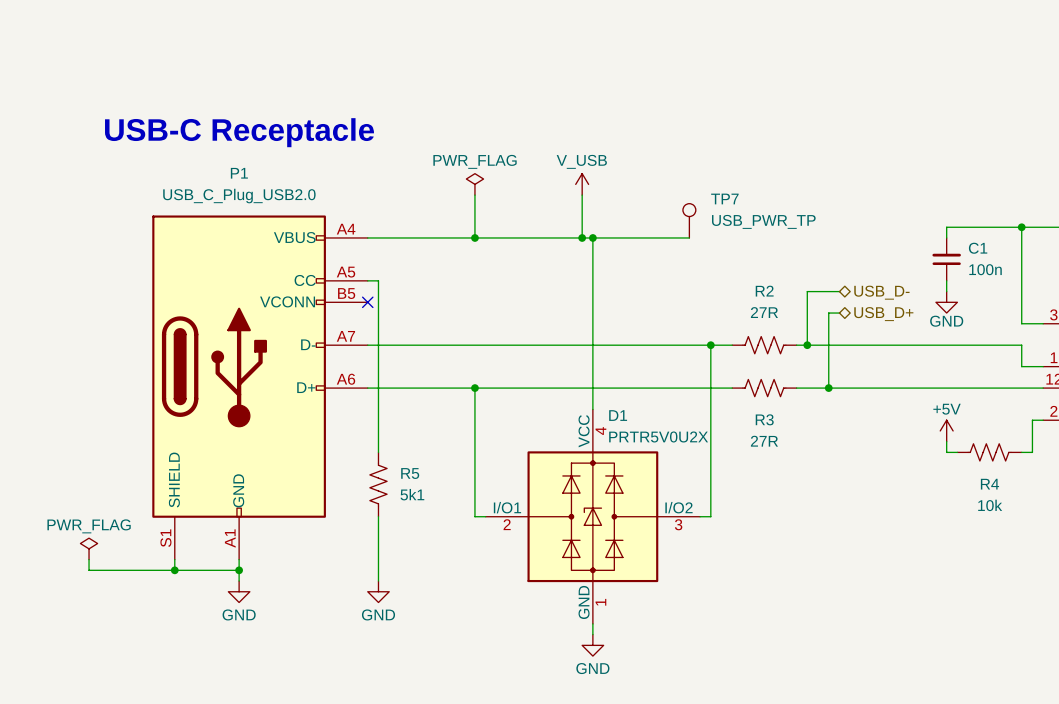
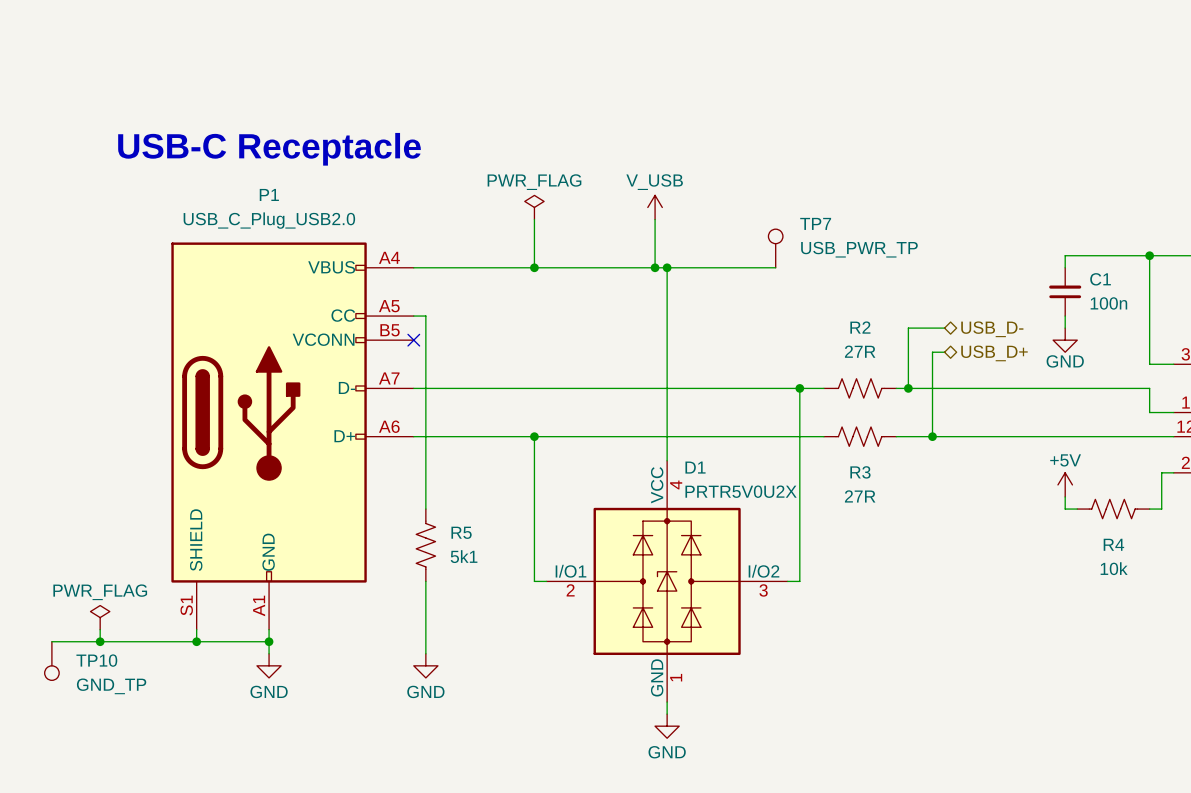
wire: none -> (51, 641) (100, 641)
junction: none -> (100, 641)
TP10: none -> GND_TP (51, 661)

